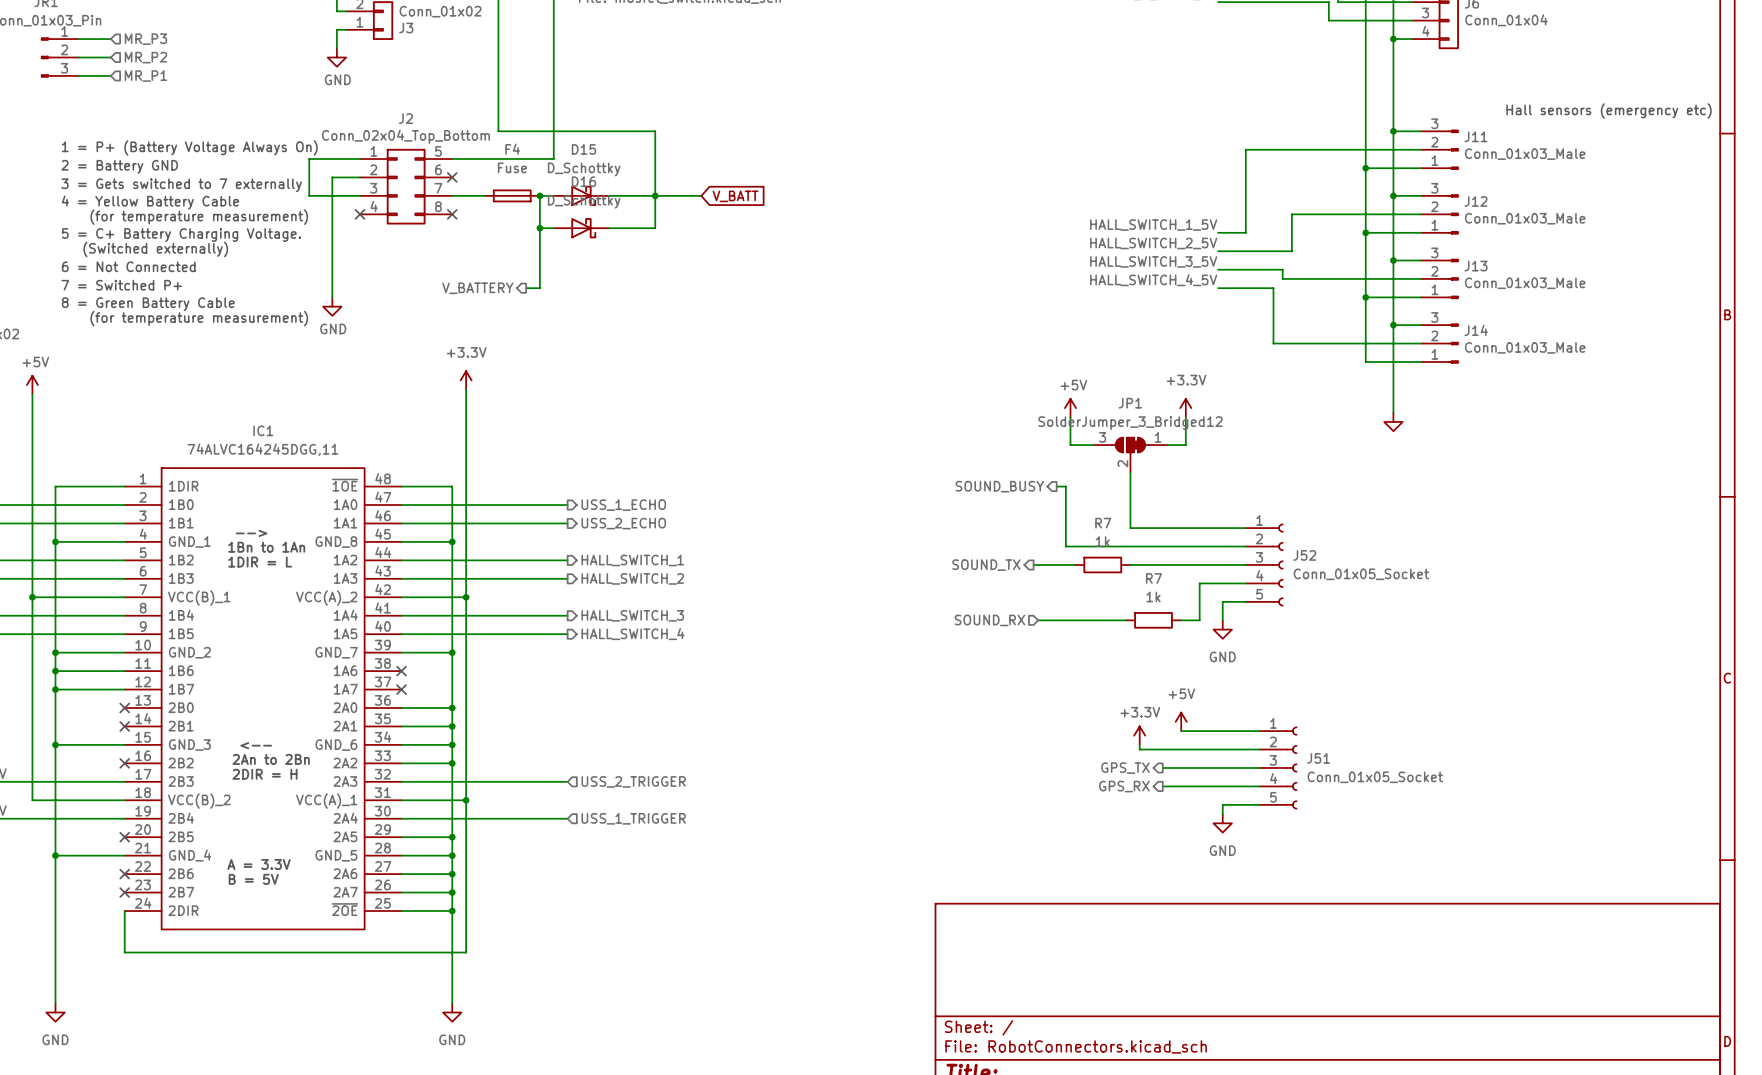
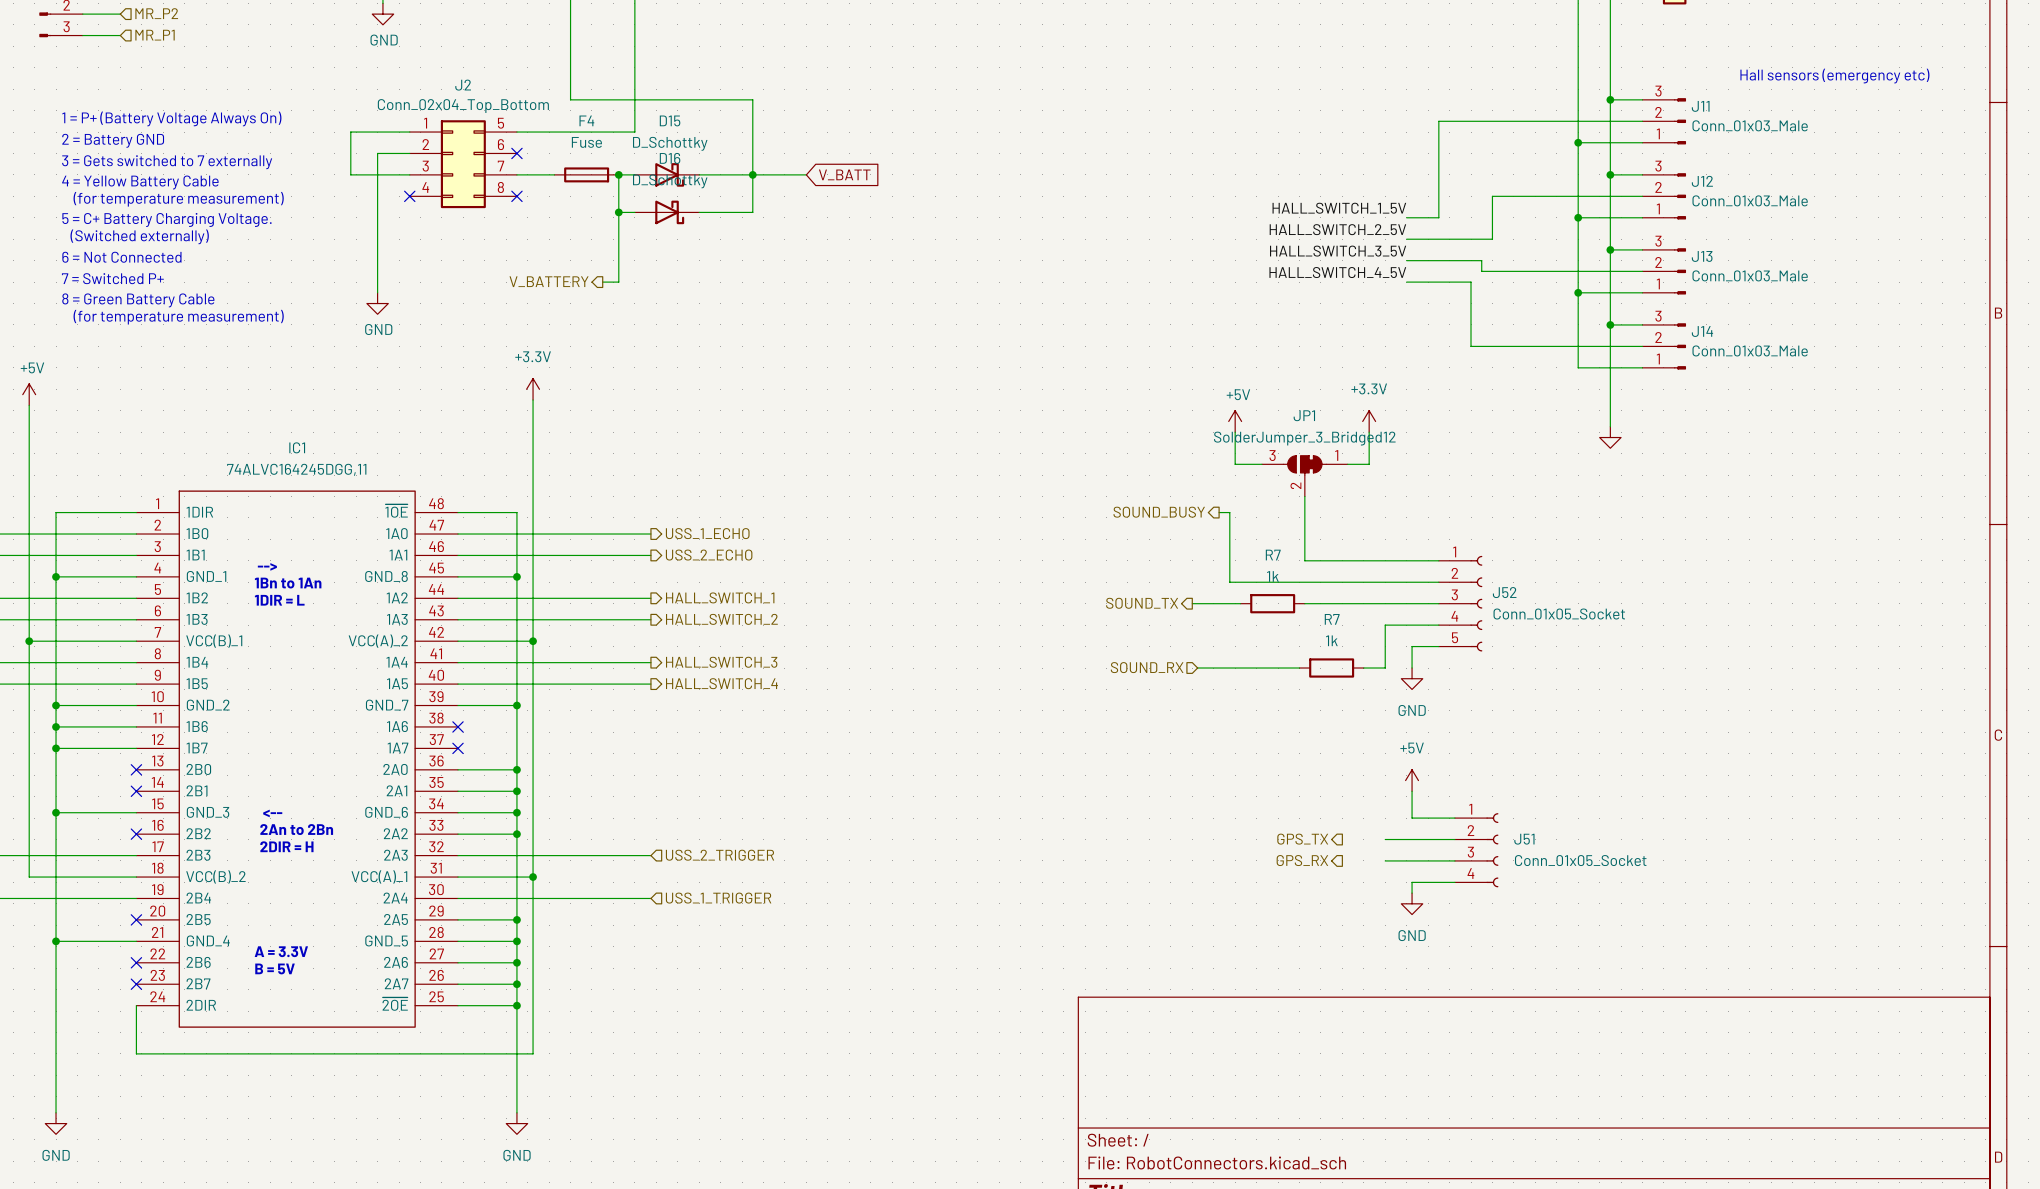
power symbol position: +5V (1181, 721) -> +5V (1412, 780)
J51 symbol: [1259, 726, 1298, 810] -> [1454, 813, 1499, 888]
wire: (1181, 731) (1259, 731) -> none
power symbol: +3.3V (1139, 735) -> none
wire: (1139, 744) (1139, 749) (1222, 749) -> (1412, 791) (1412, 818)
wire: (1162, 767) (1199, 767) -> none
wire: (1162, 786) (1199, 786) -> none

